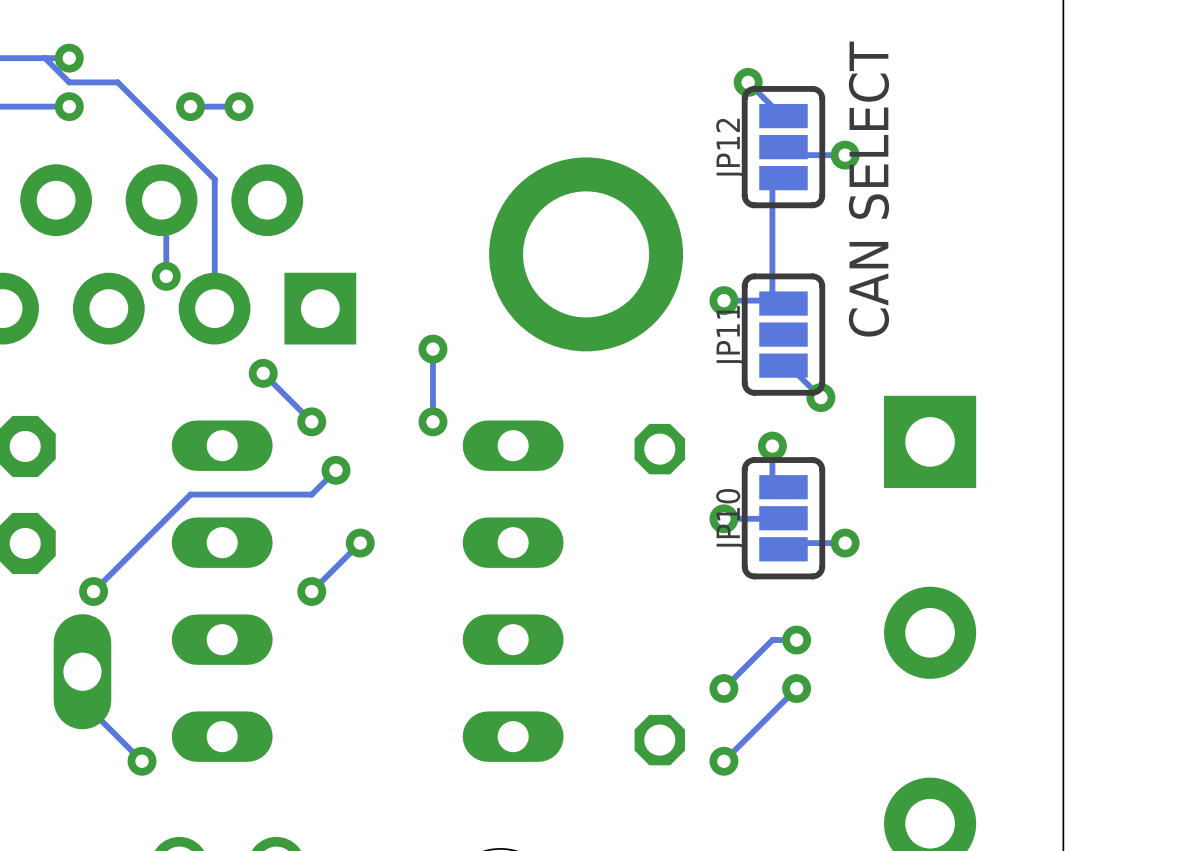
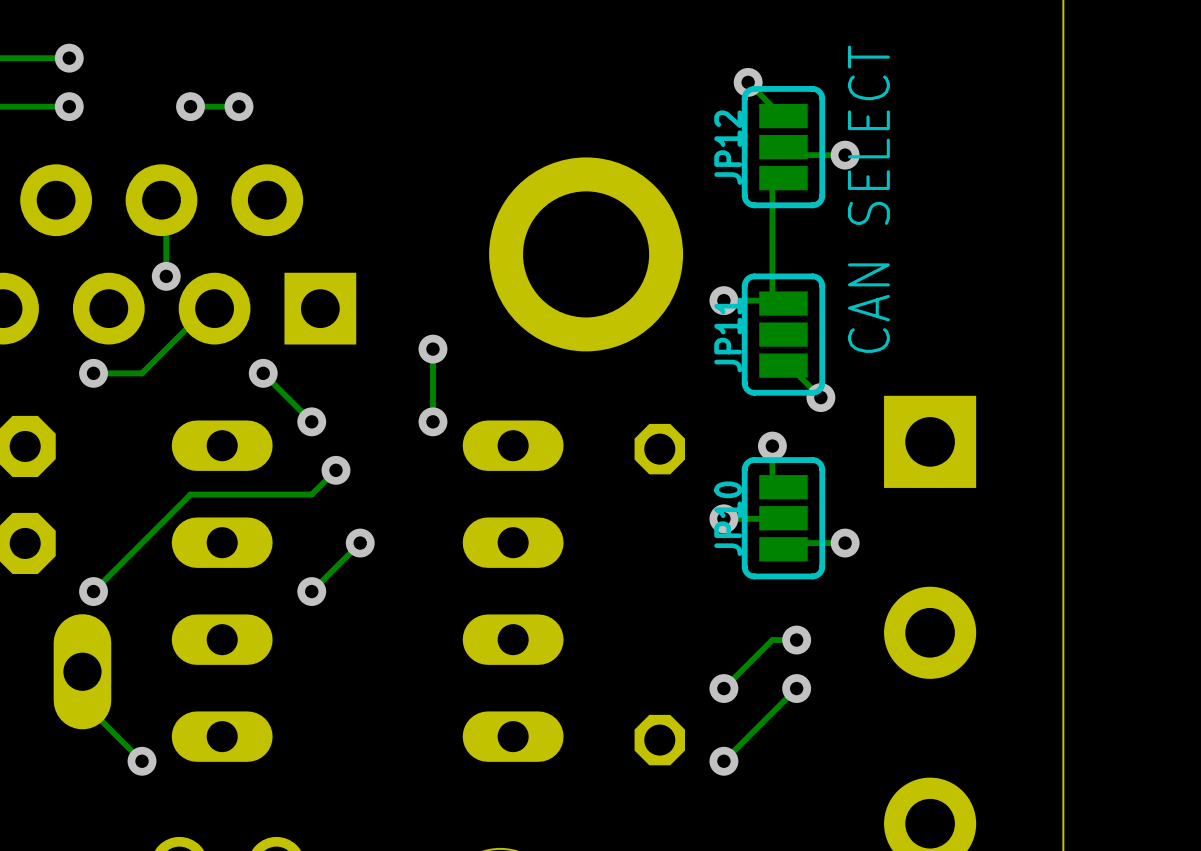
track: (45, 58) (69, 82) (117, 82) (214, 179) (214, 308) -> (93, 373) (142, 373) (190, 324) (214, 308)
via: none -> (93, 373)

